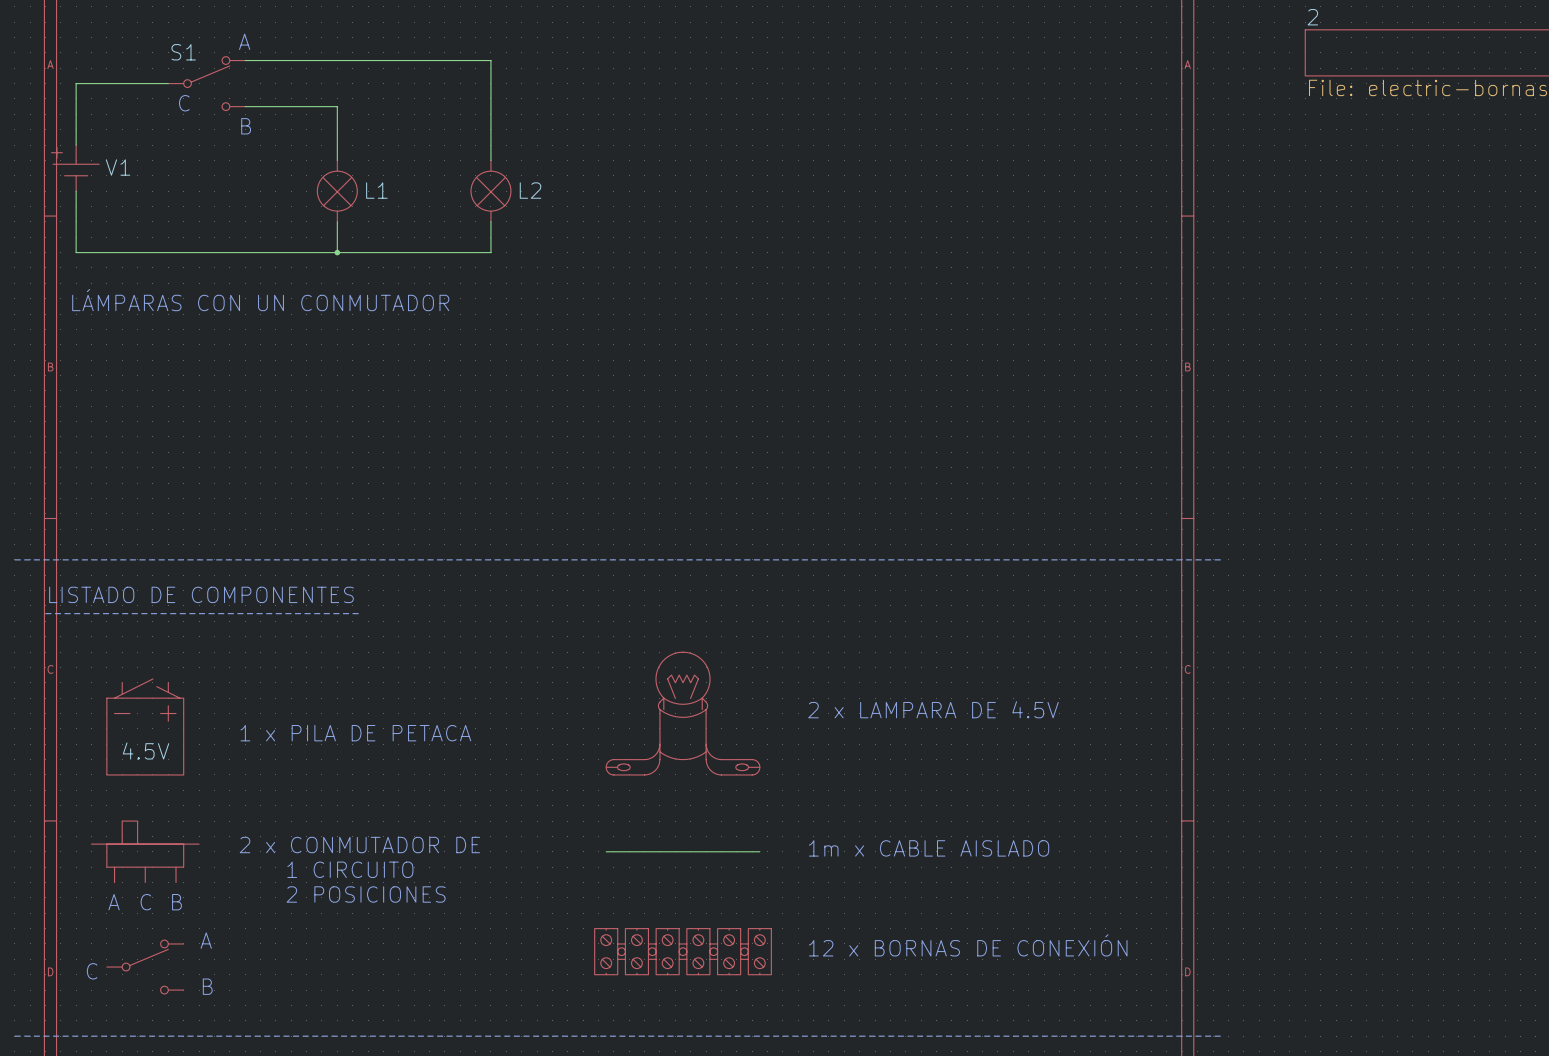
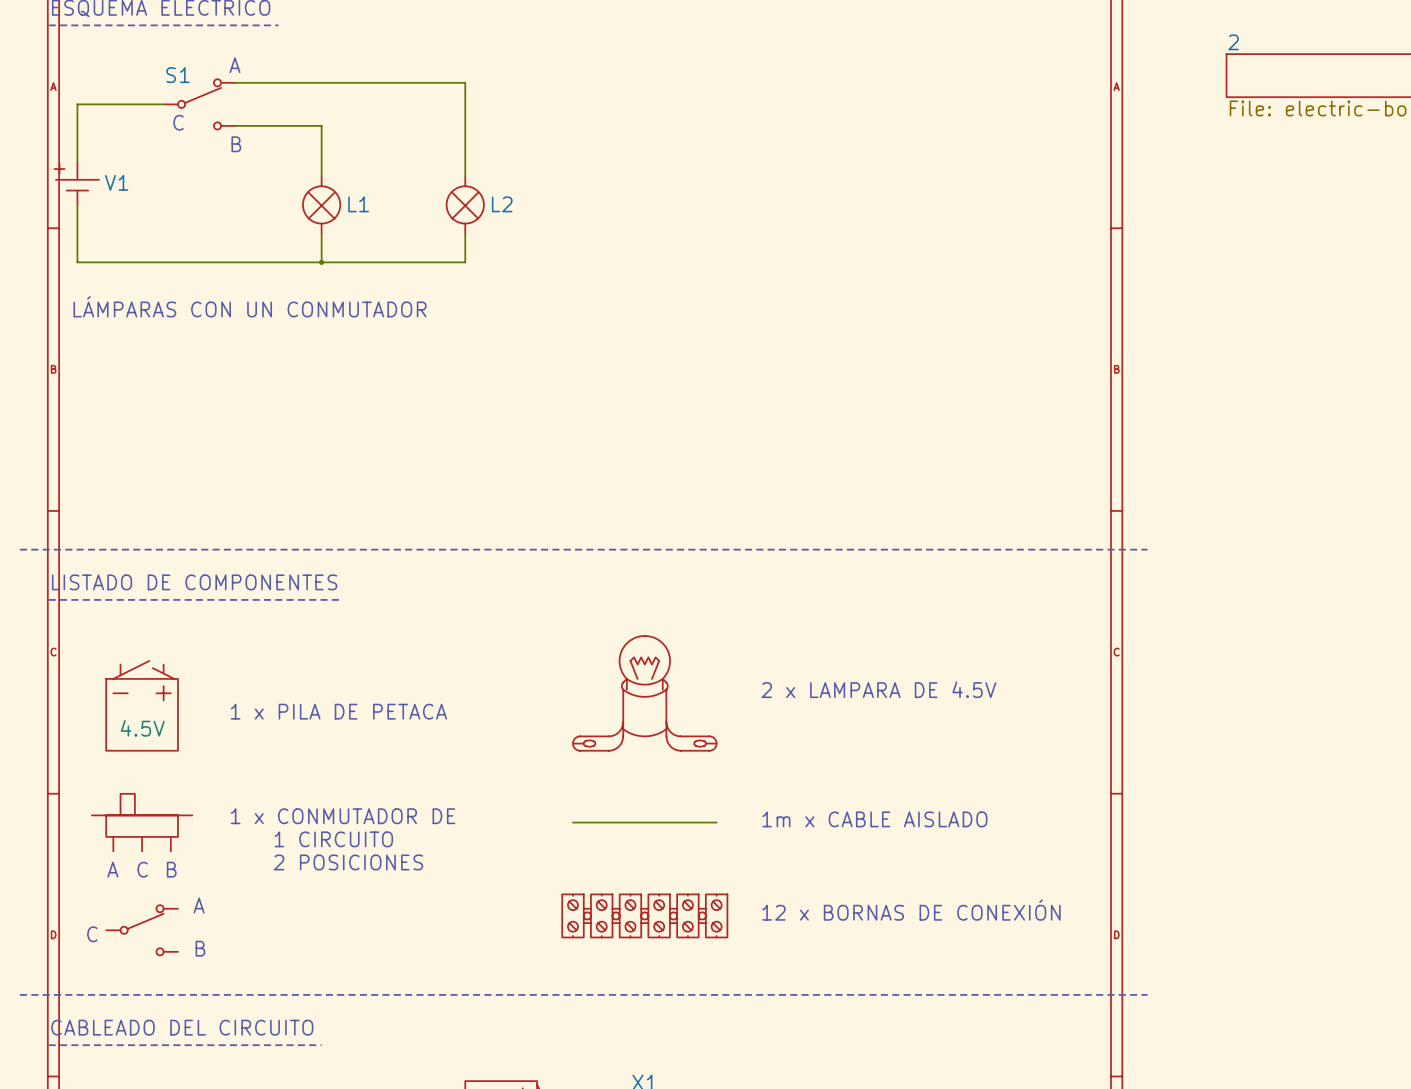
text: 2 x CONMUTADOR DE (359, 845) -> 1 x CONMUTADOR DE (343, 816)

